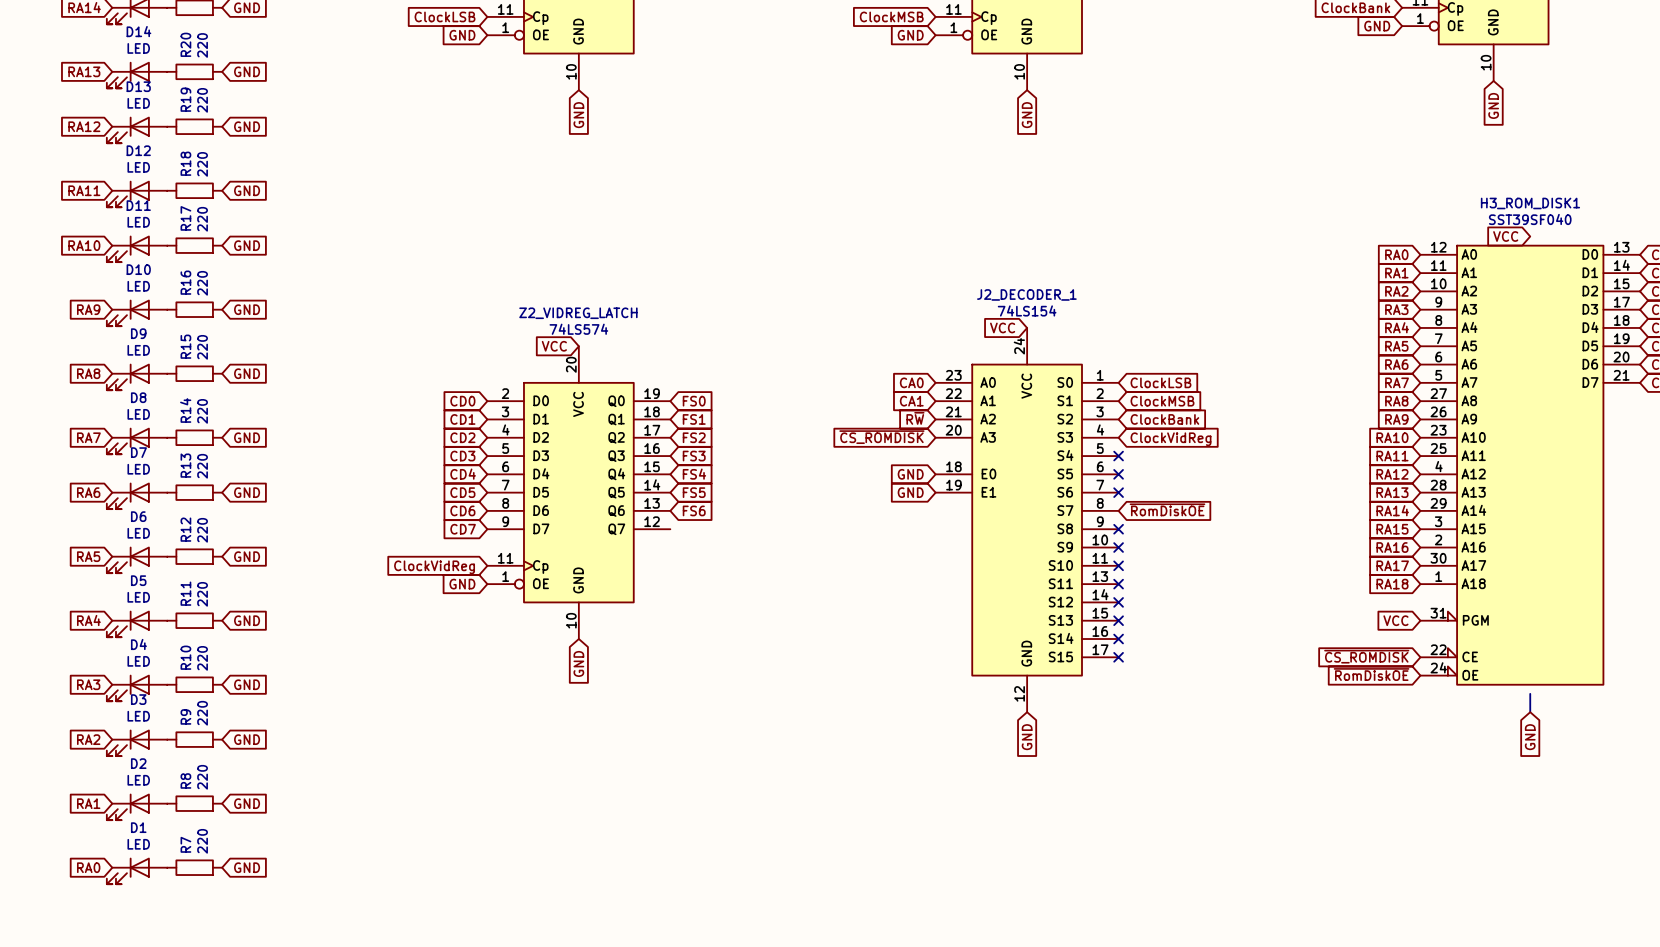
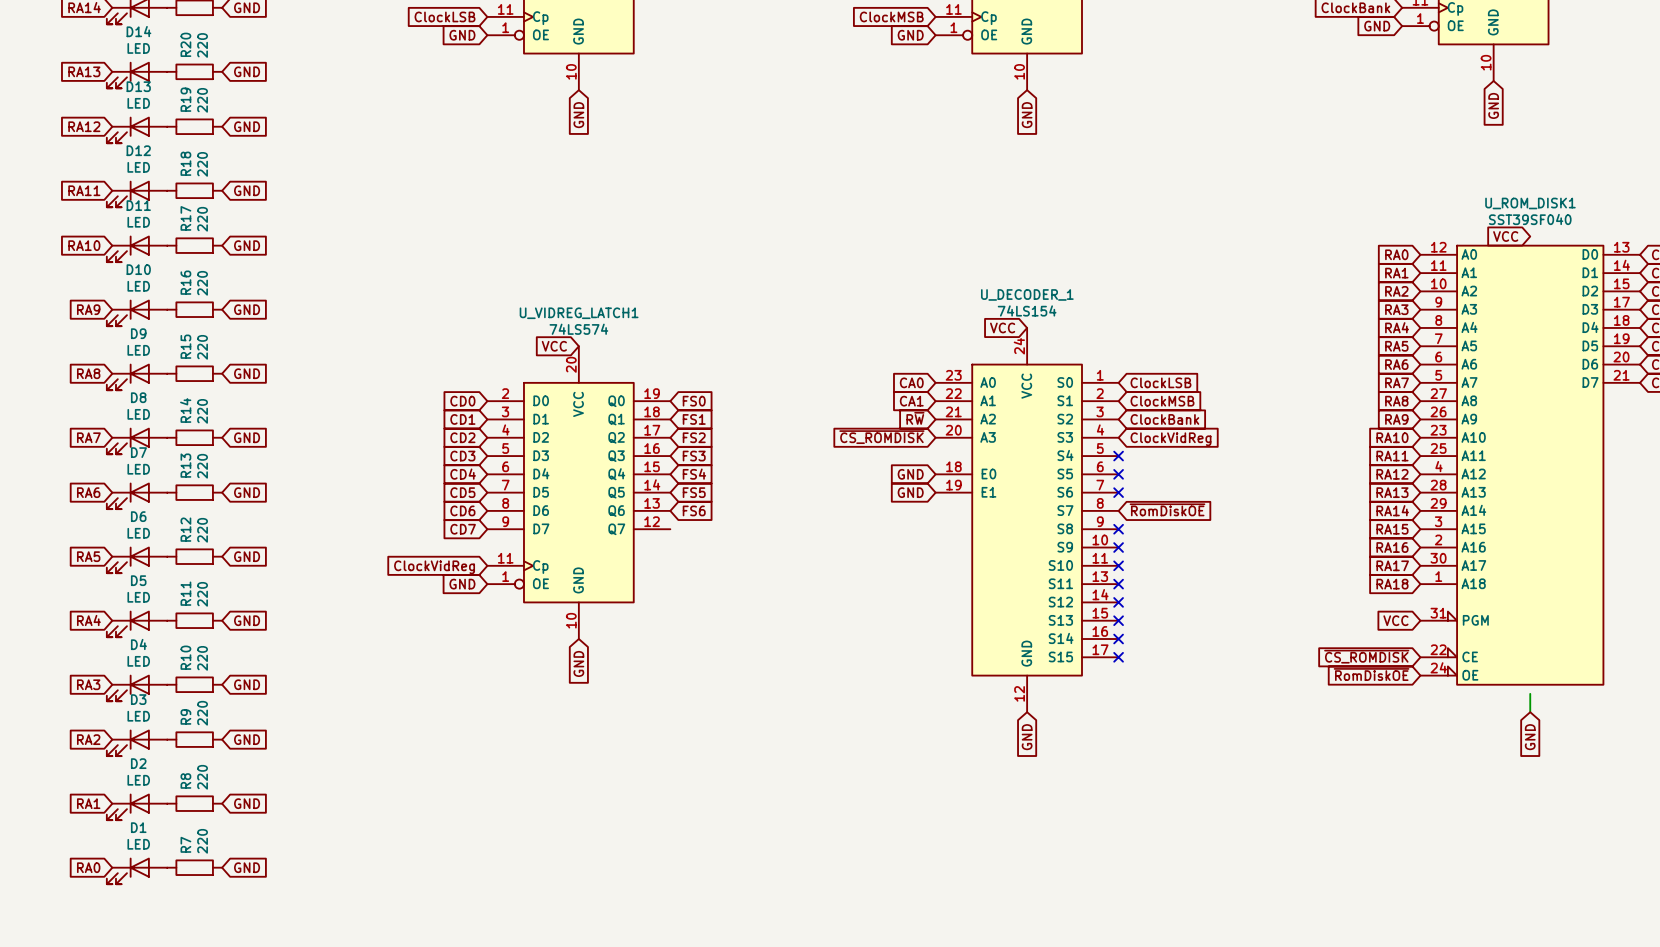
H3_ROM_DISK1 name: H3_ROM_DISK1 (1530, 203) -> U_ROM_DISK1 (1530, 203)
J2_DECODER_1 name: J2_DECODER_1 (1026, 294) -> U_DECODER_1 (1027, 294)
Z2_VIDREG_LATCH name: Z2_VIDREG_LATCH (578, 313) -> U_VIDREG_LATCH1 (579, 313)

